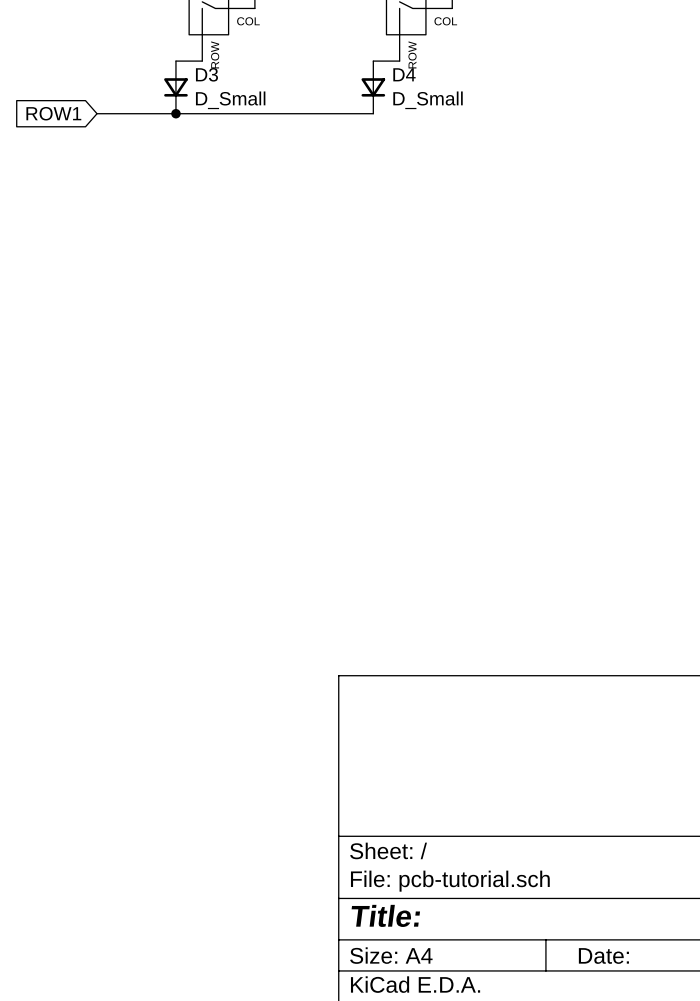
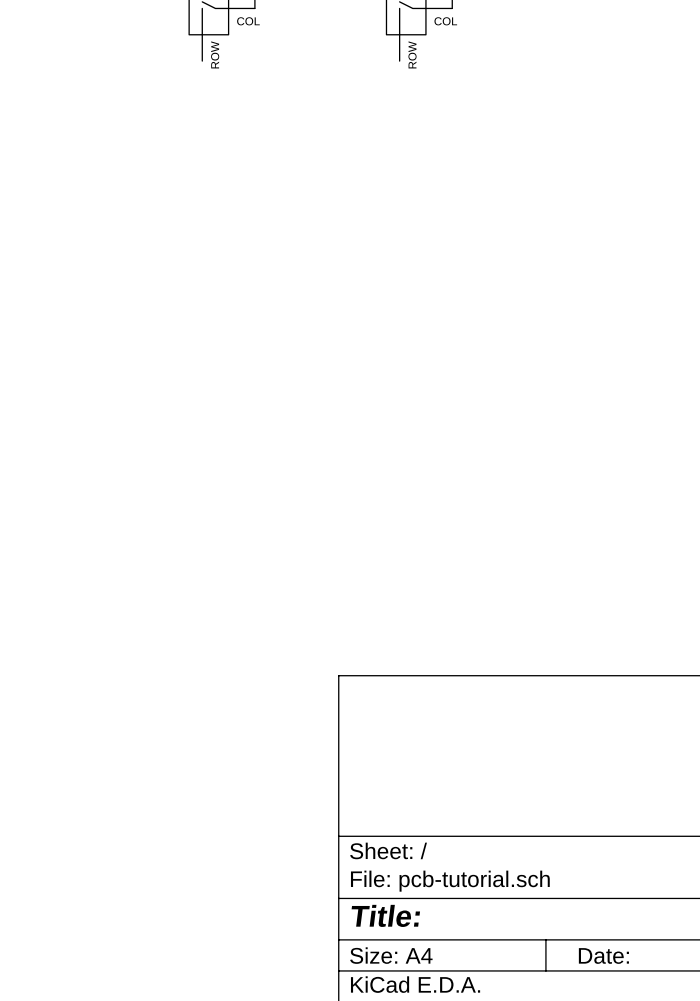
wire: (175, 61) (202, 61) -> none
wire: (373, 61) (399, 61) -> none
D3: D_Small (175, 87) -> none
D4: D_Small (373, 87) -> none
global label: ROW1 (53, 113) -> none
wire: (97, 113) (373, 113) -> none
junction: (175, 113) -> none

